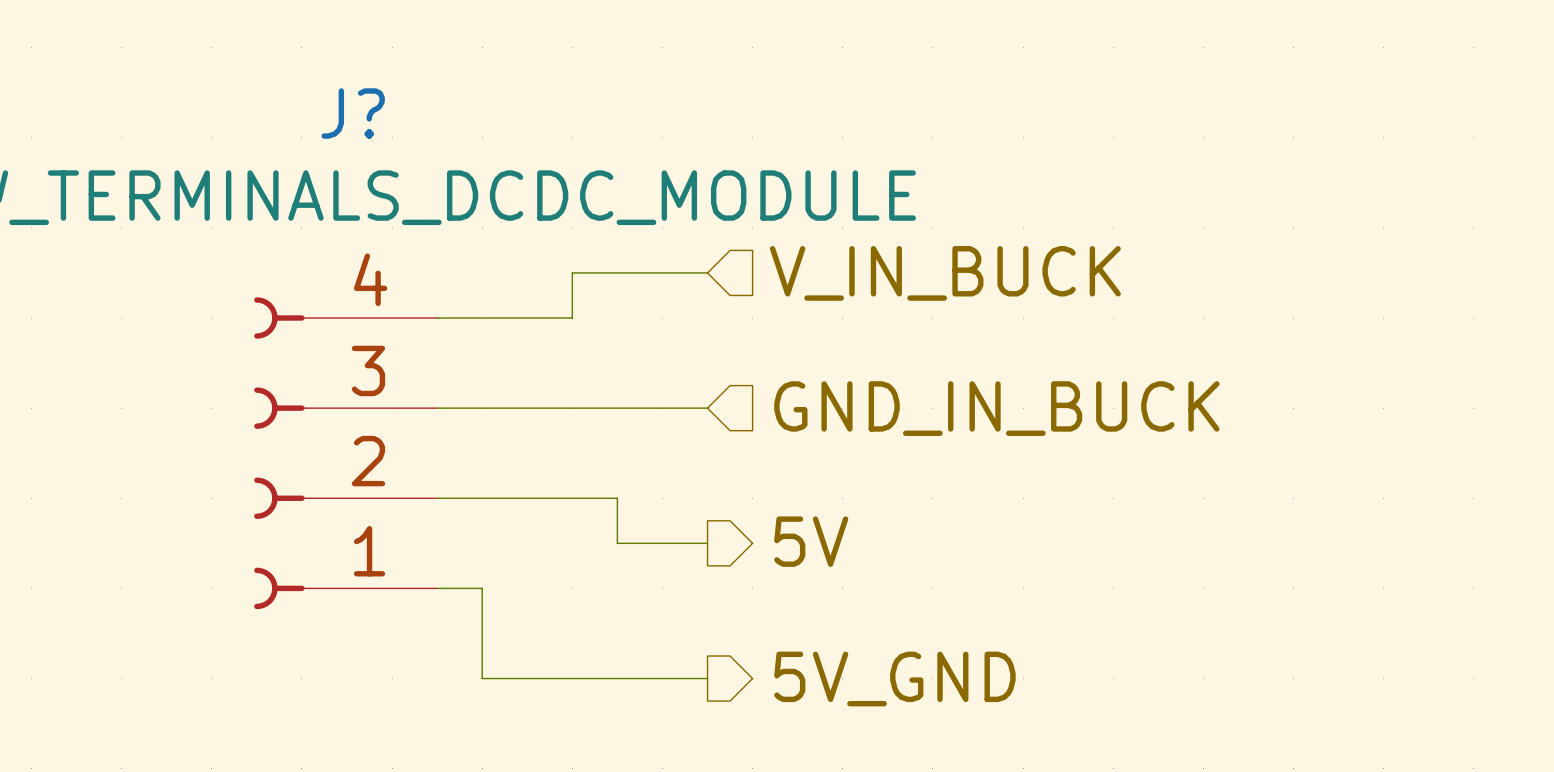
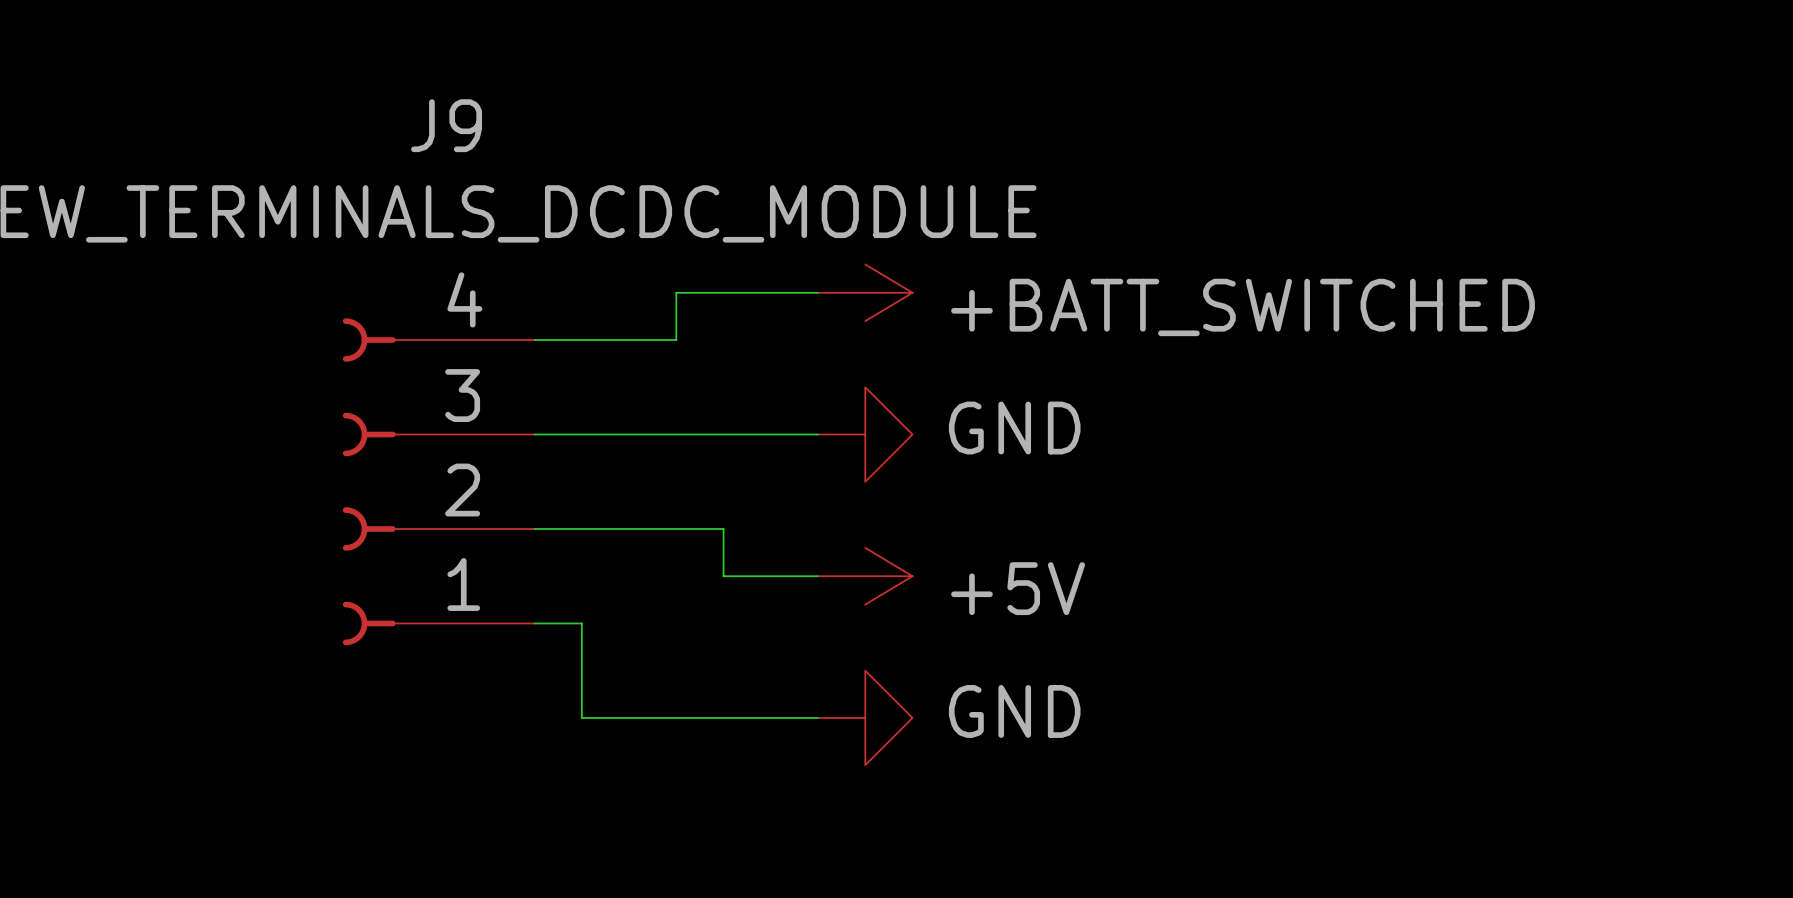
J? name: J? (353, 113) -> J9 (446, 125)
power symbol: none -> +BATT_SWITCHED (865, 292)
hierarchical label: V_IN_BUCK (945, 273) -> none
power symbol: none -> GND (865, 434)
hierarchical label: GND_IN_BUCK (996, 408) -> none
hierarchical label: 5V (811, 541) -> none
power symbol: none -> +5V (865, 576)
power symbol: none -> GND (865, 717)
hierarchical label: 5V_GND (894, 679) -> none

